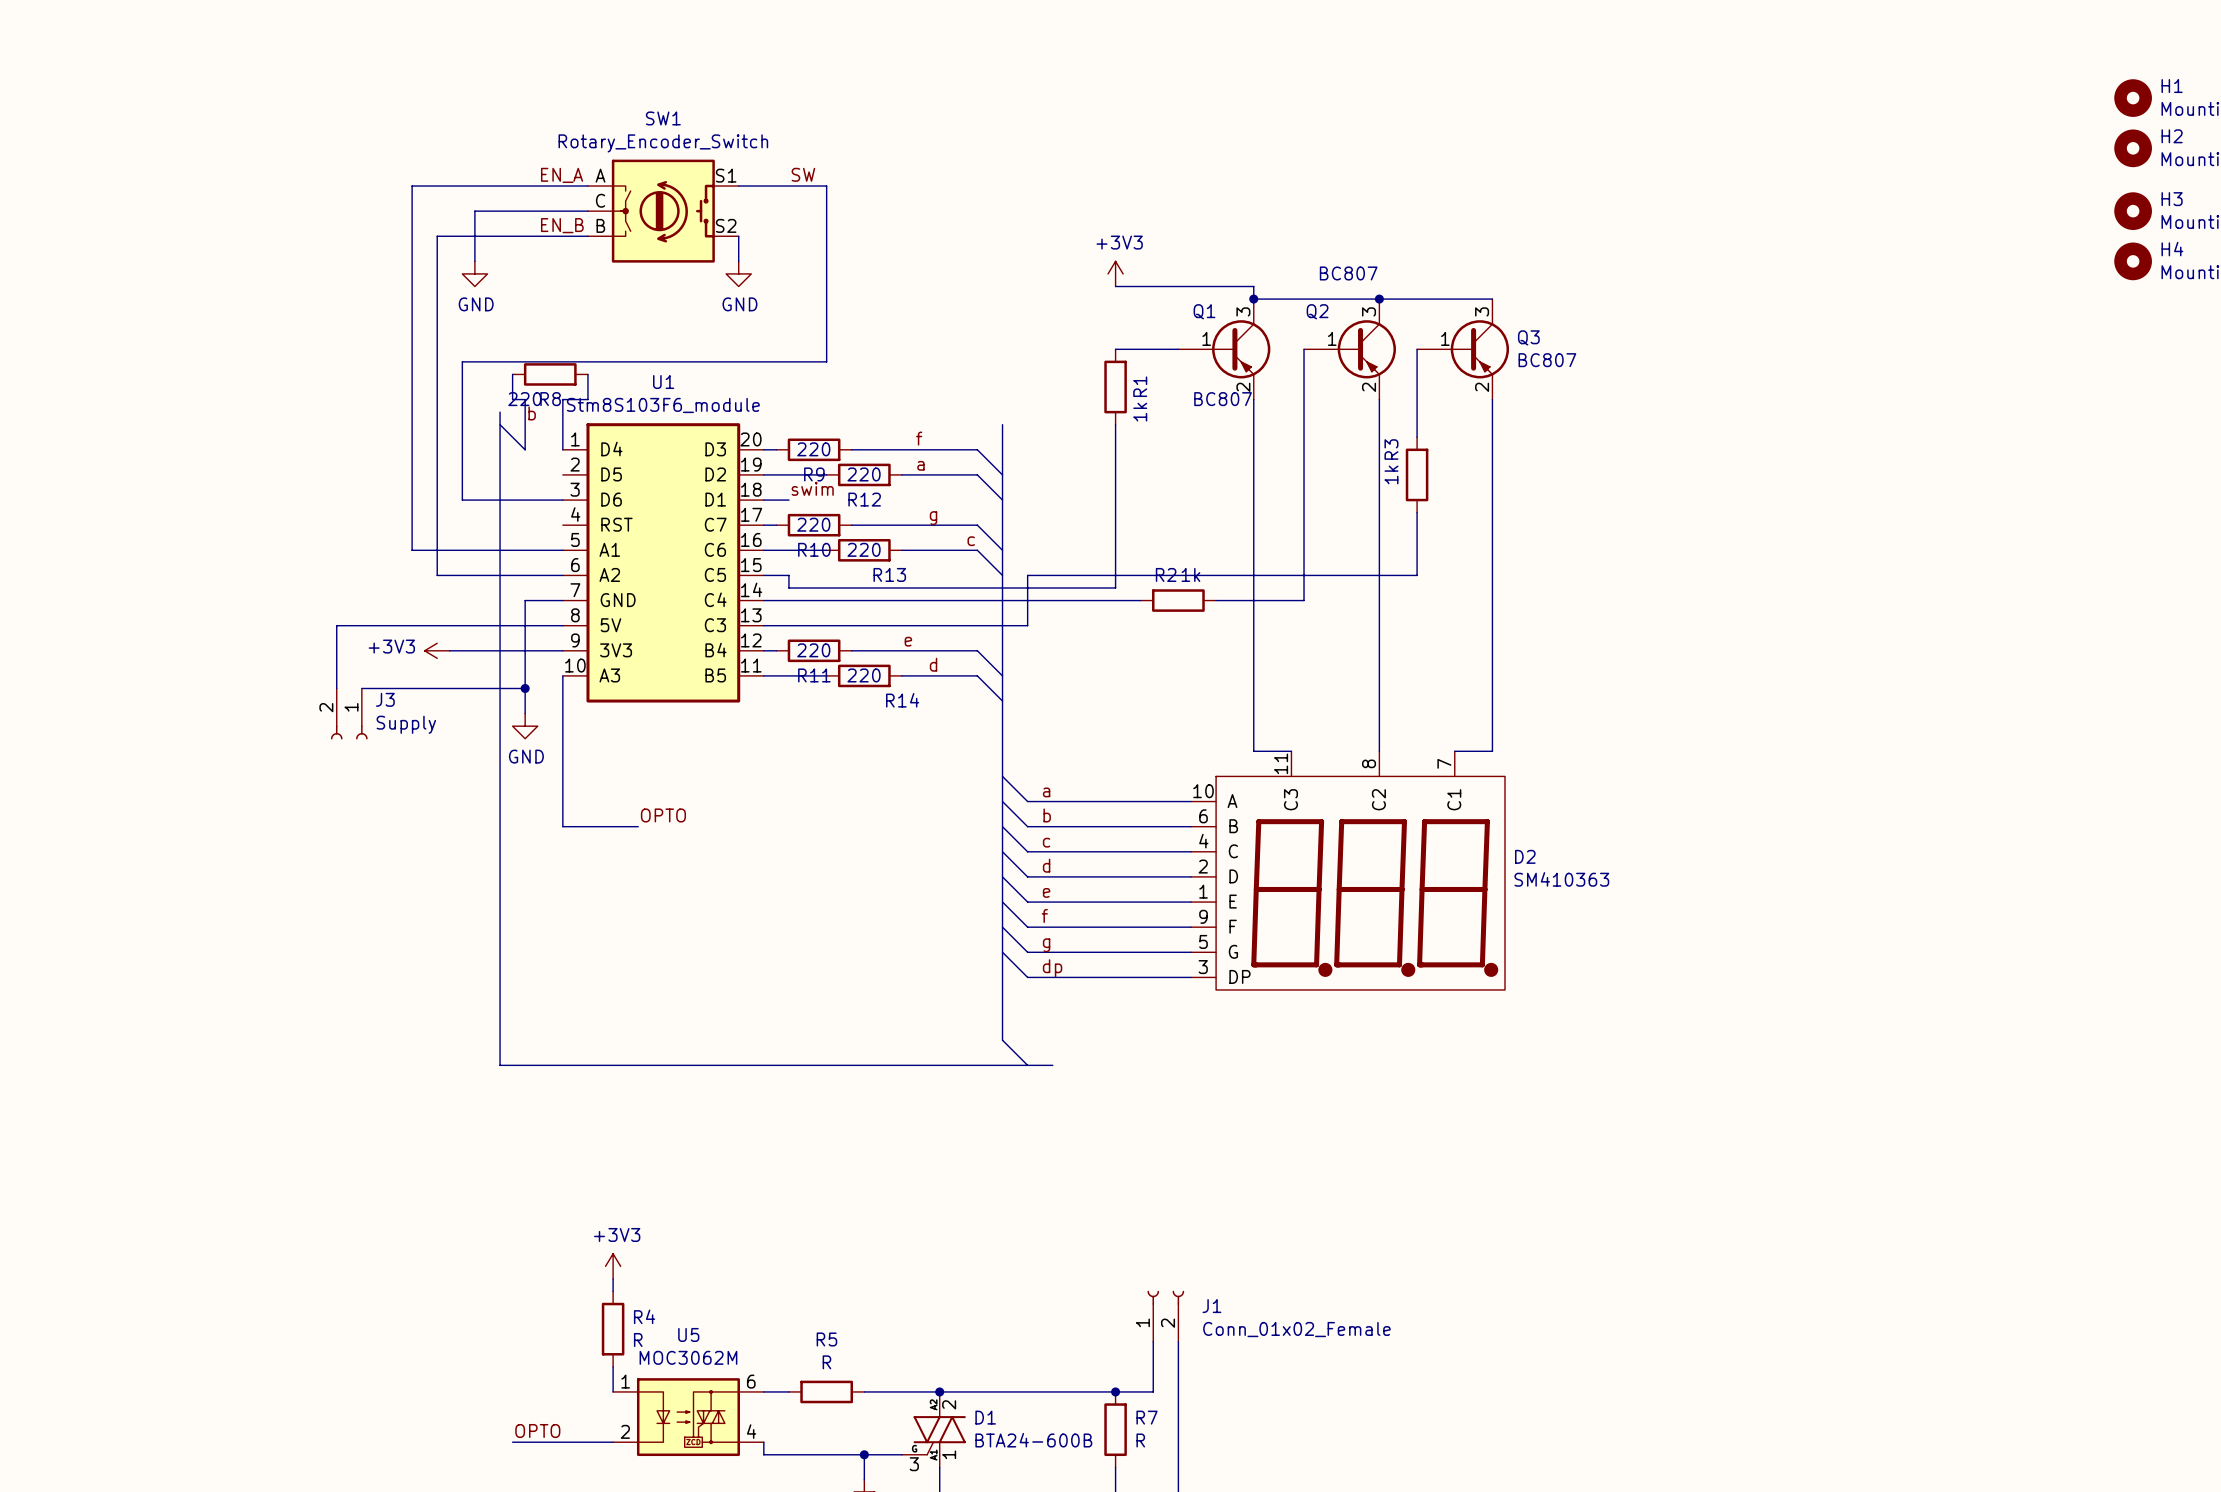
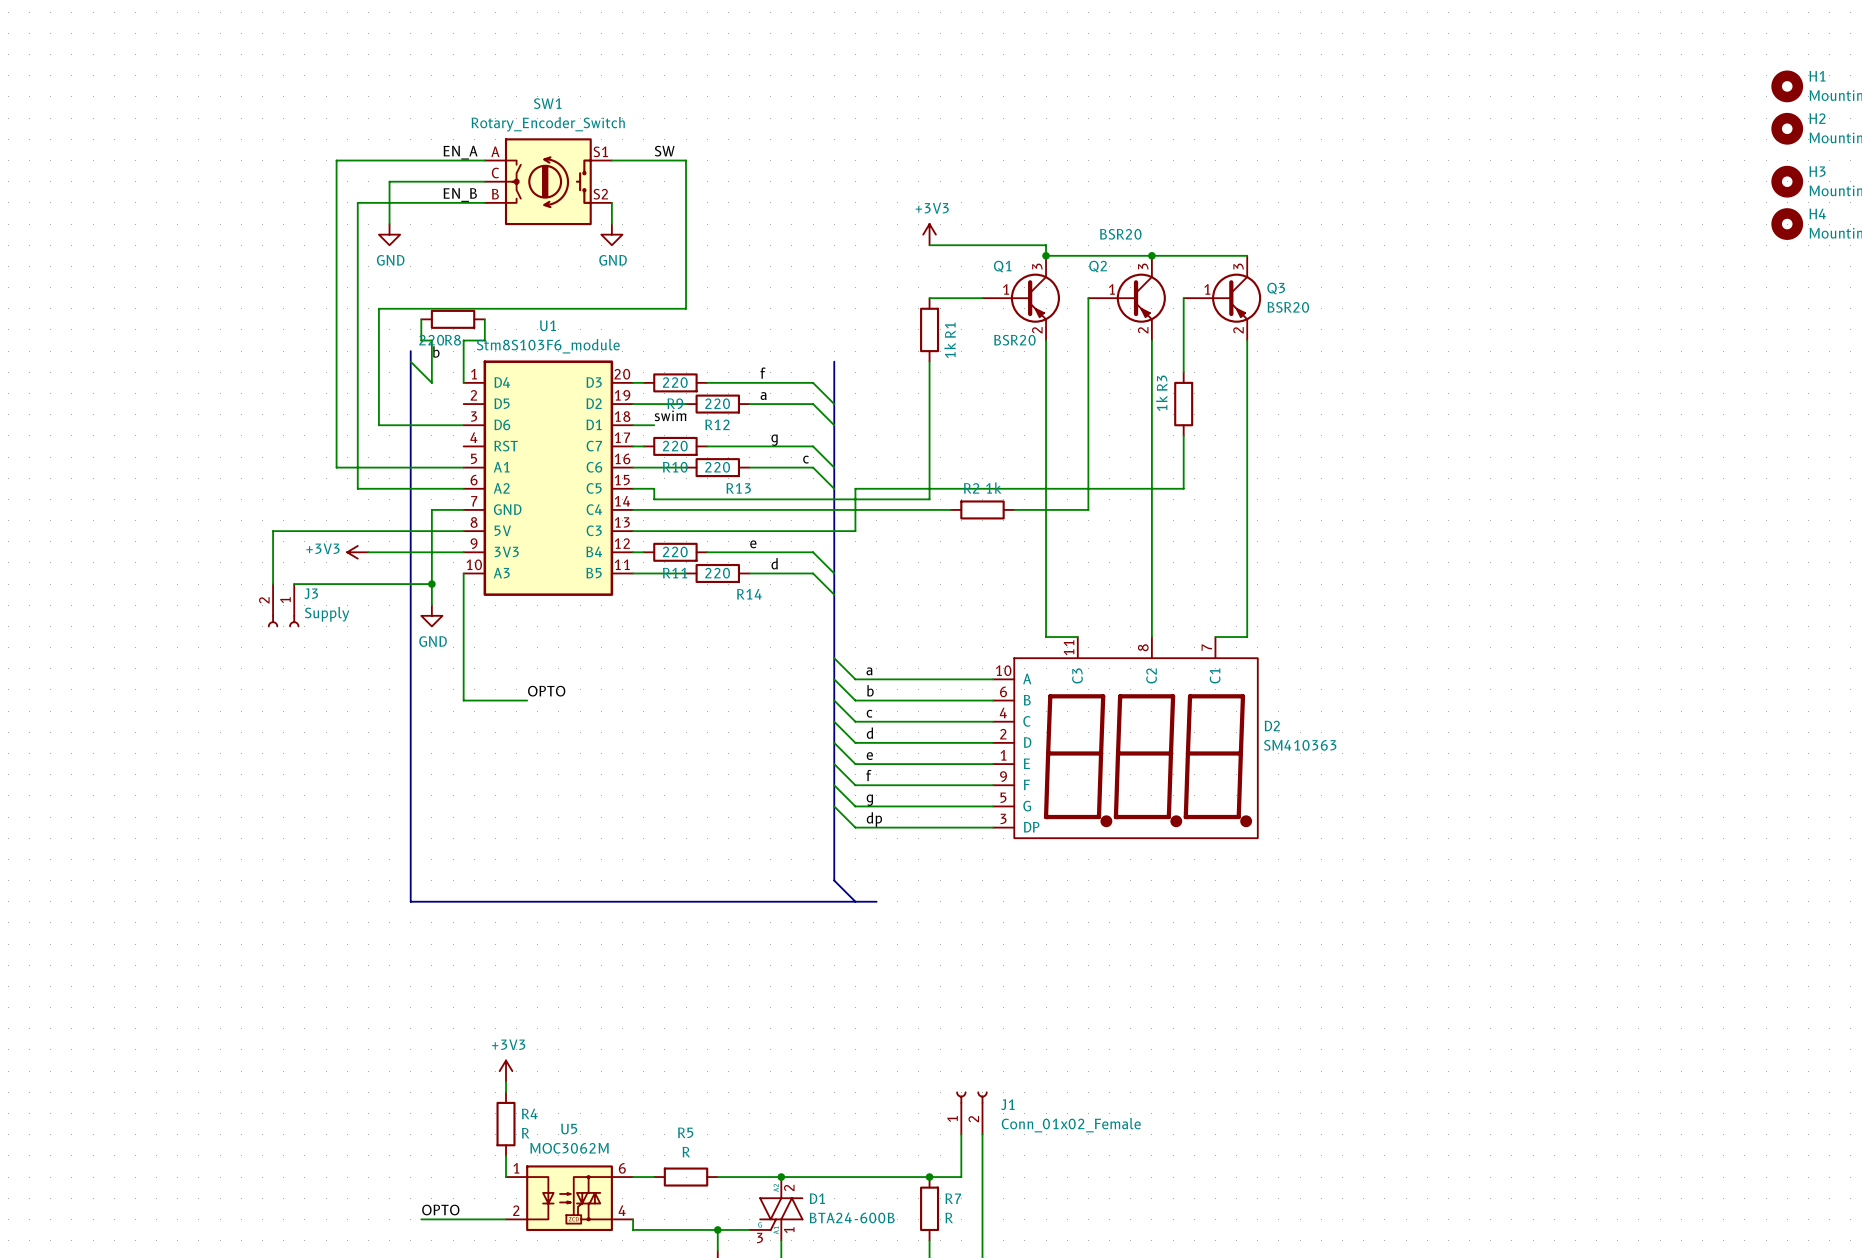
Q2 value: BC807 (1348, 273) -> BSR20 (1120, 234)
Q3 value: BC807 (1547, 360) -> BSR20 (1288, 307)
Q1 value: BC807 (1223, 399) -> BSR20 (1014, 340)

